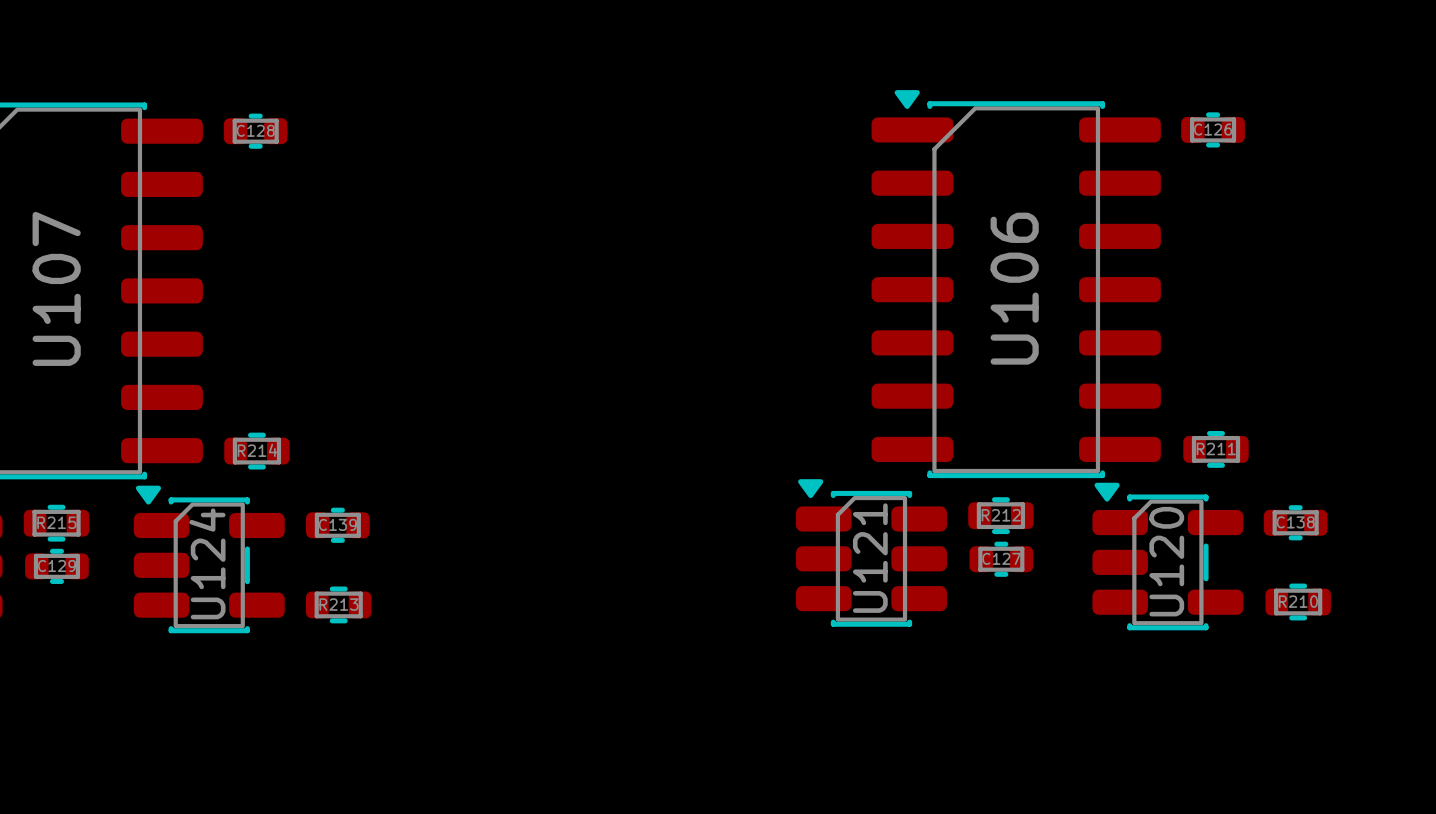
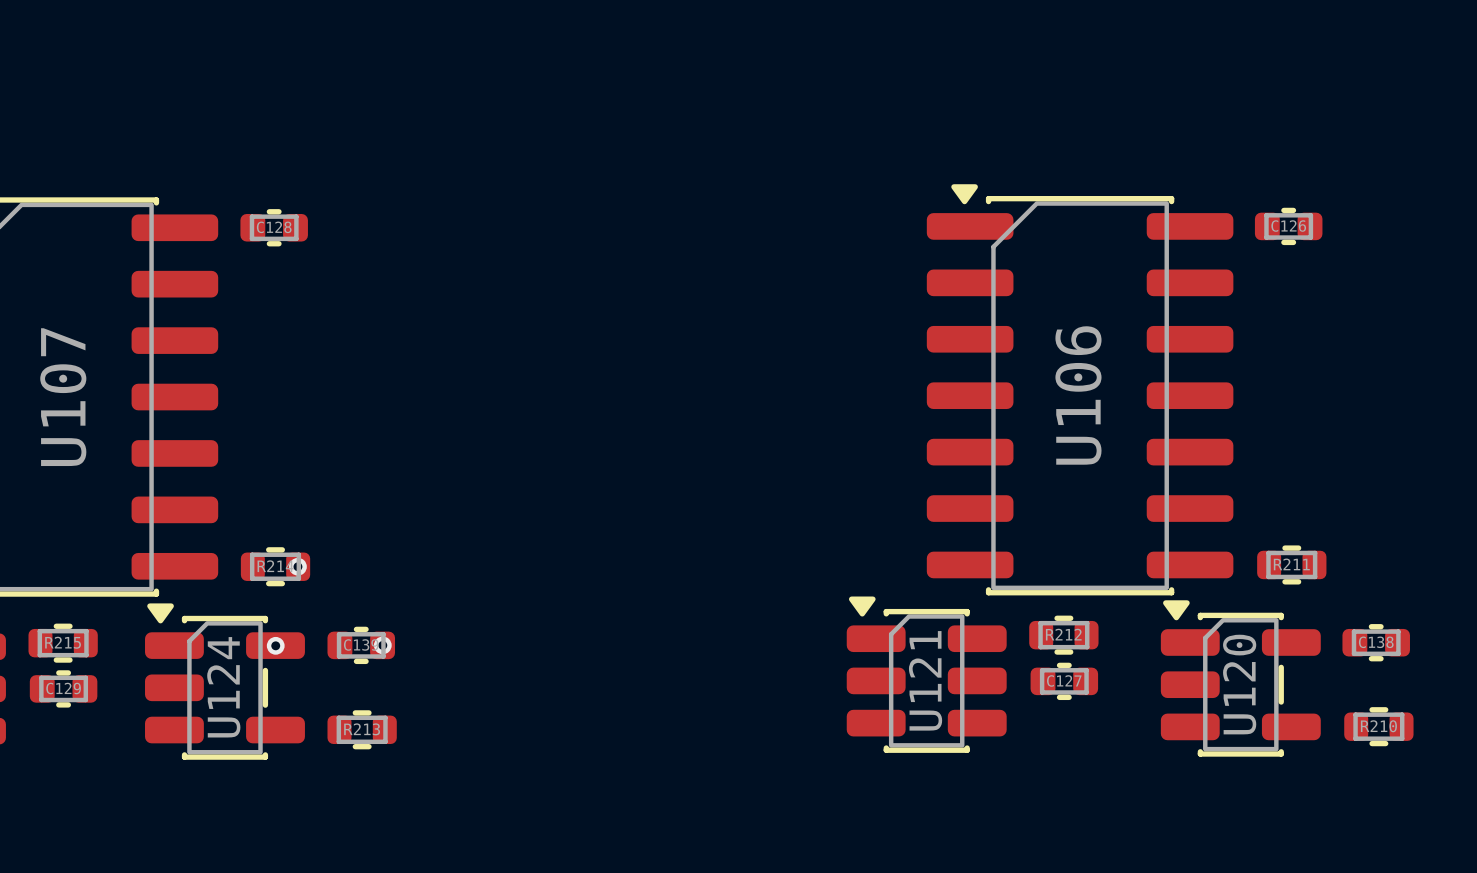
via: none -> (297, 566)
via: none -> (275, 645)
via: none -> (382, 645)

